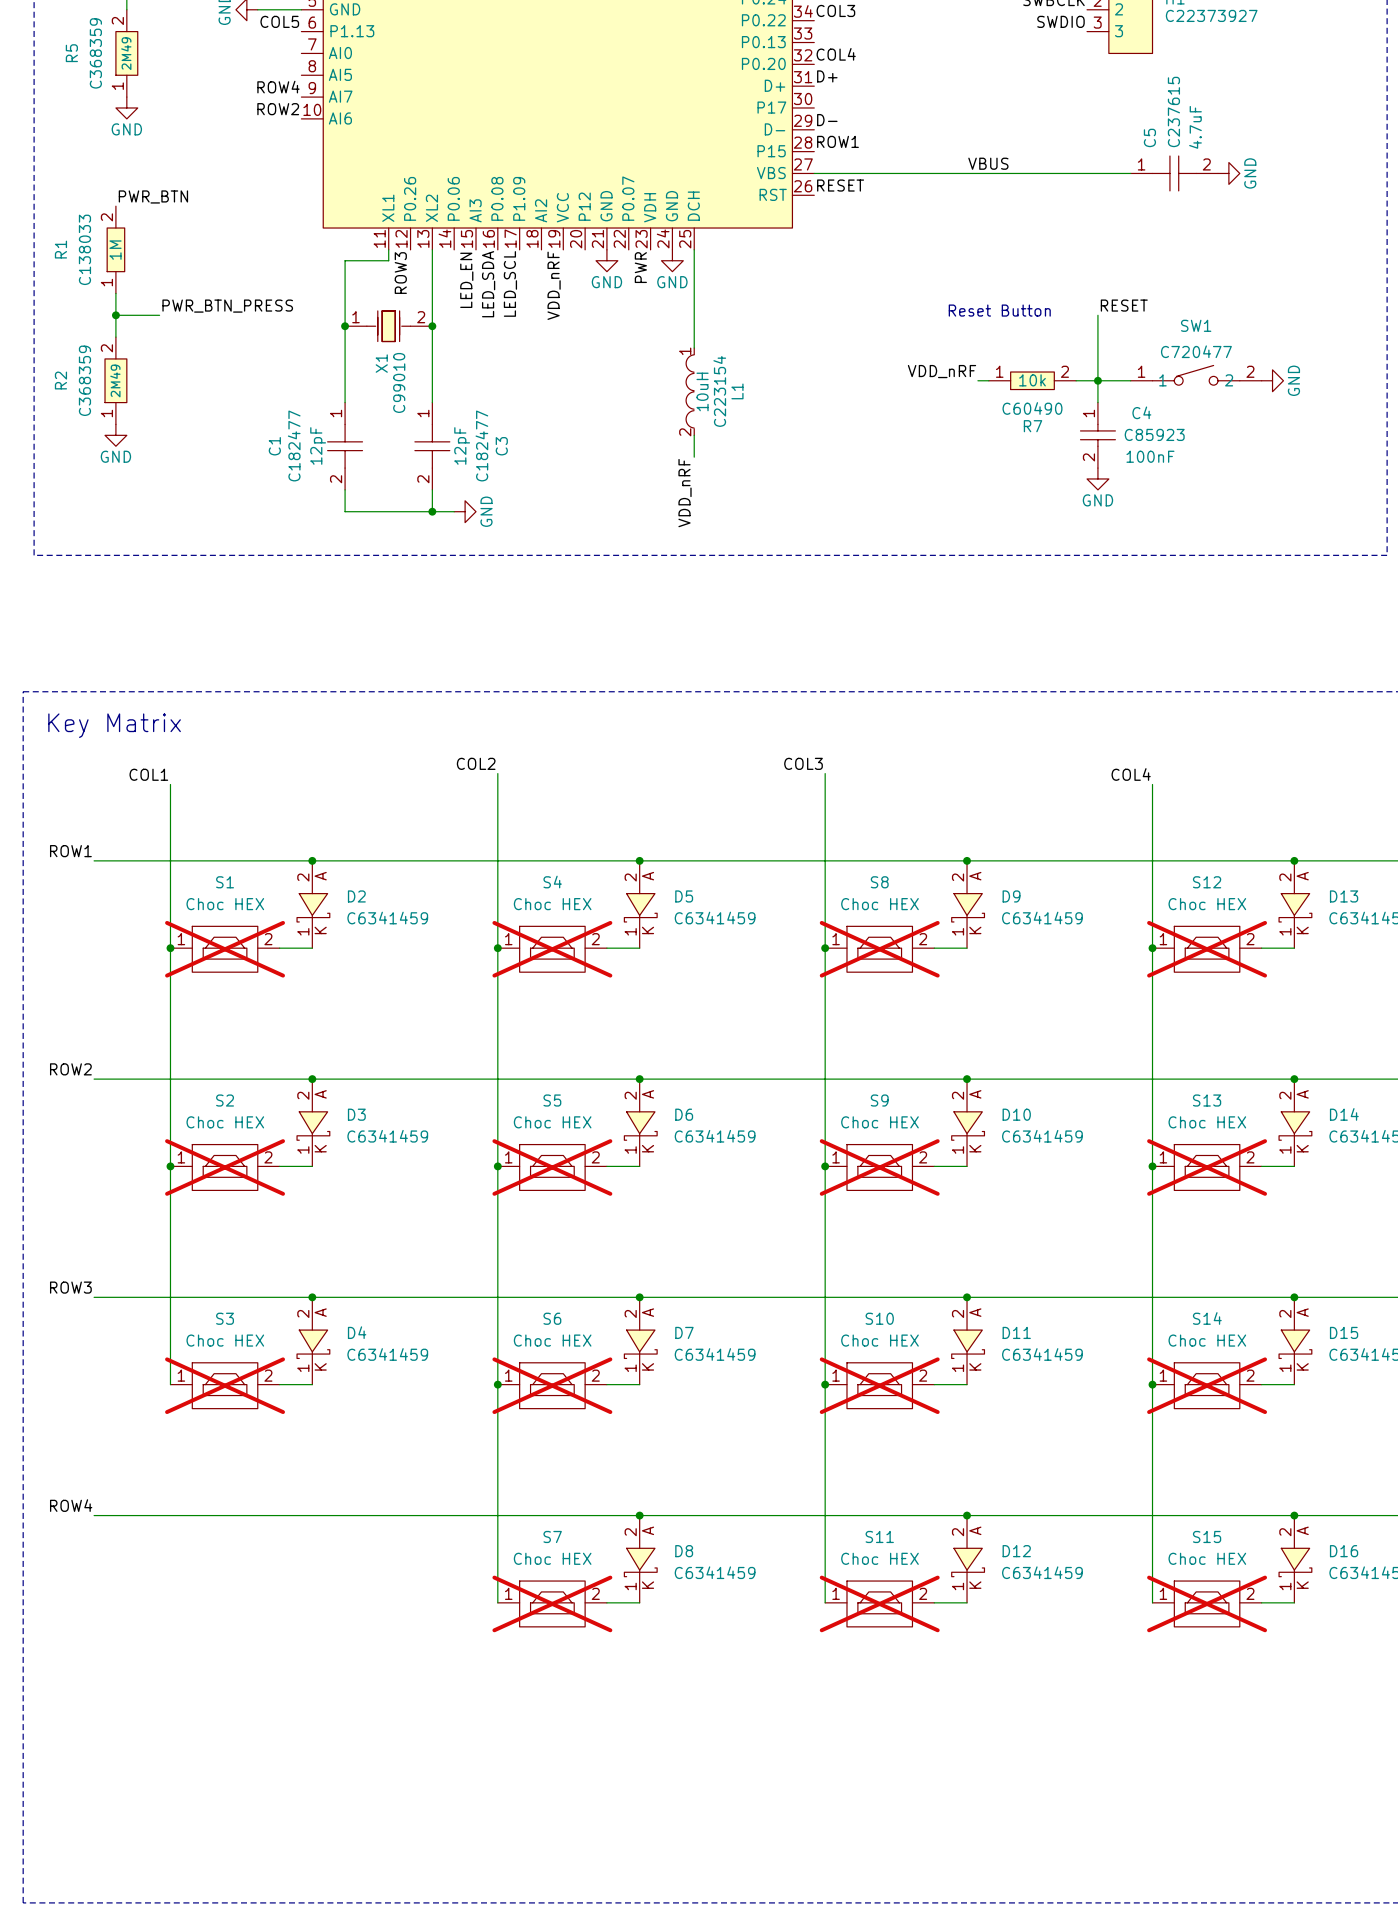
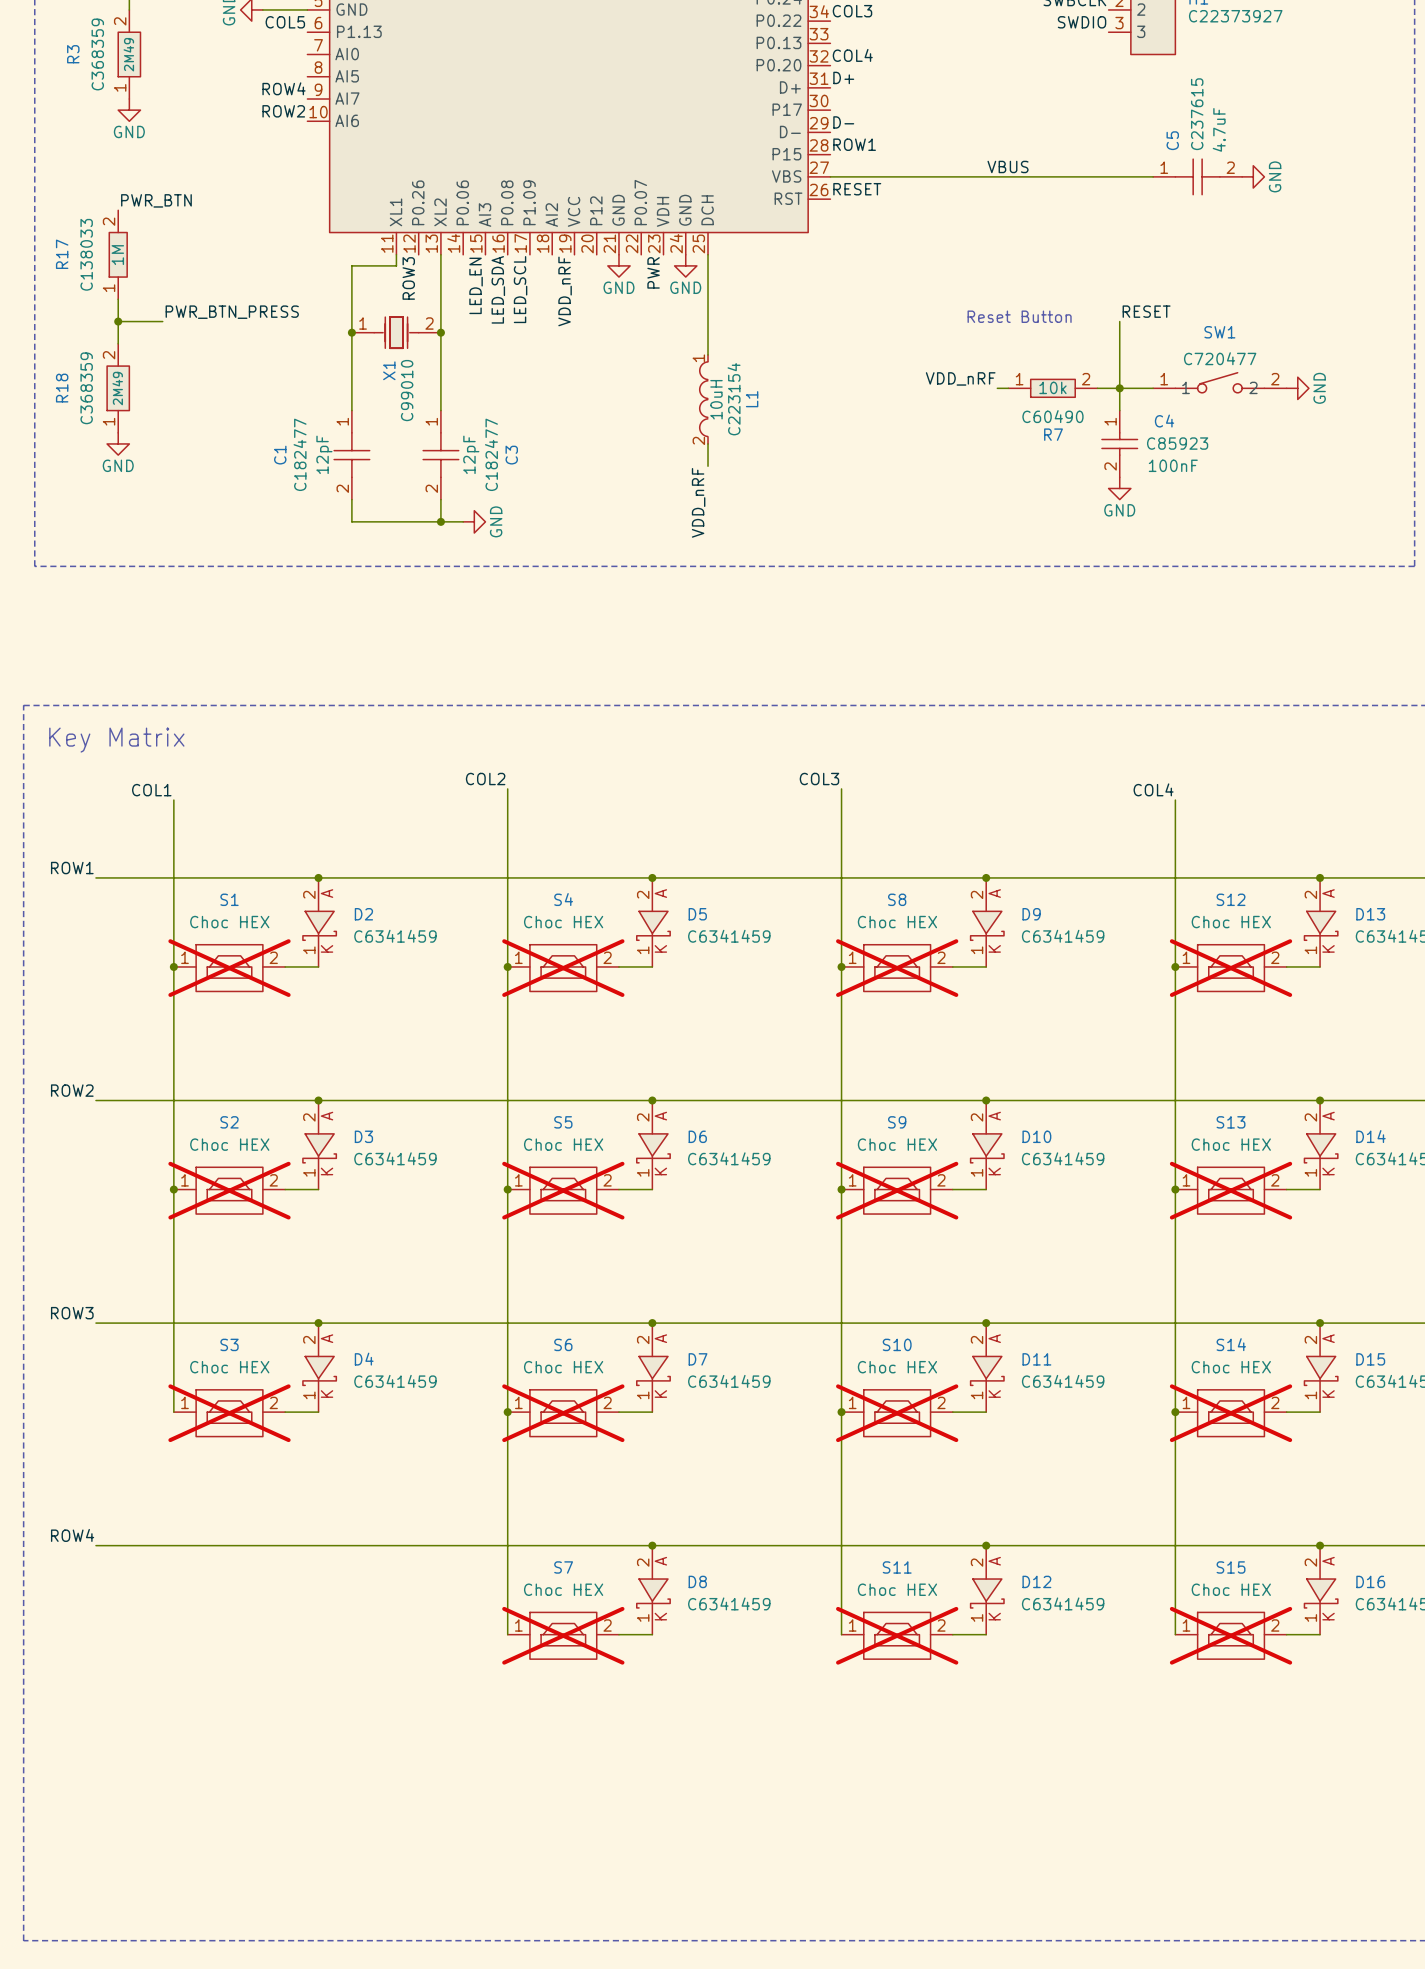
R5 name: R5 (71, 53) -> R3 (73, 54)
R1 name: R1 (60, 249) -> R17 (62, 254)
R2 name: R2 (60, 380) -> R18 (62, 388)

